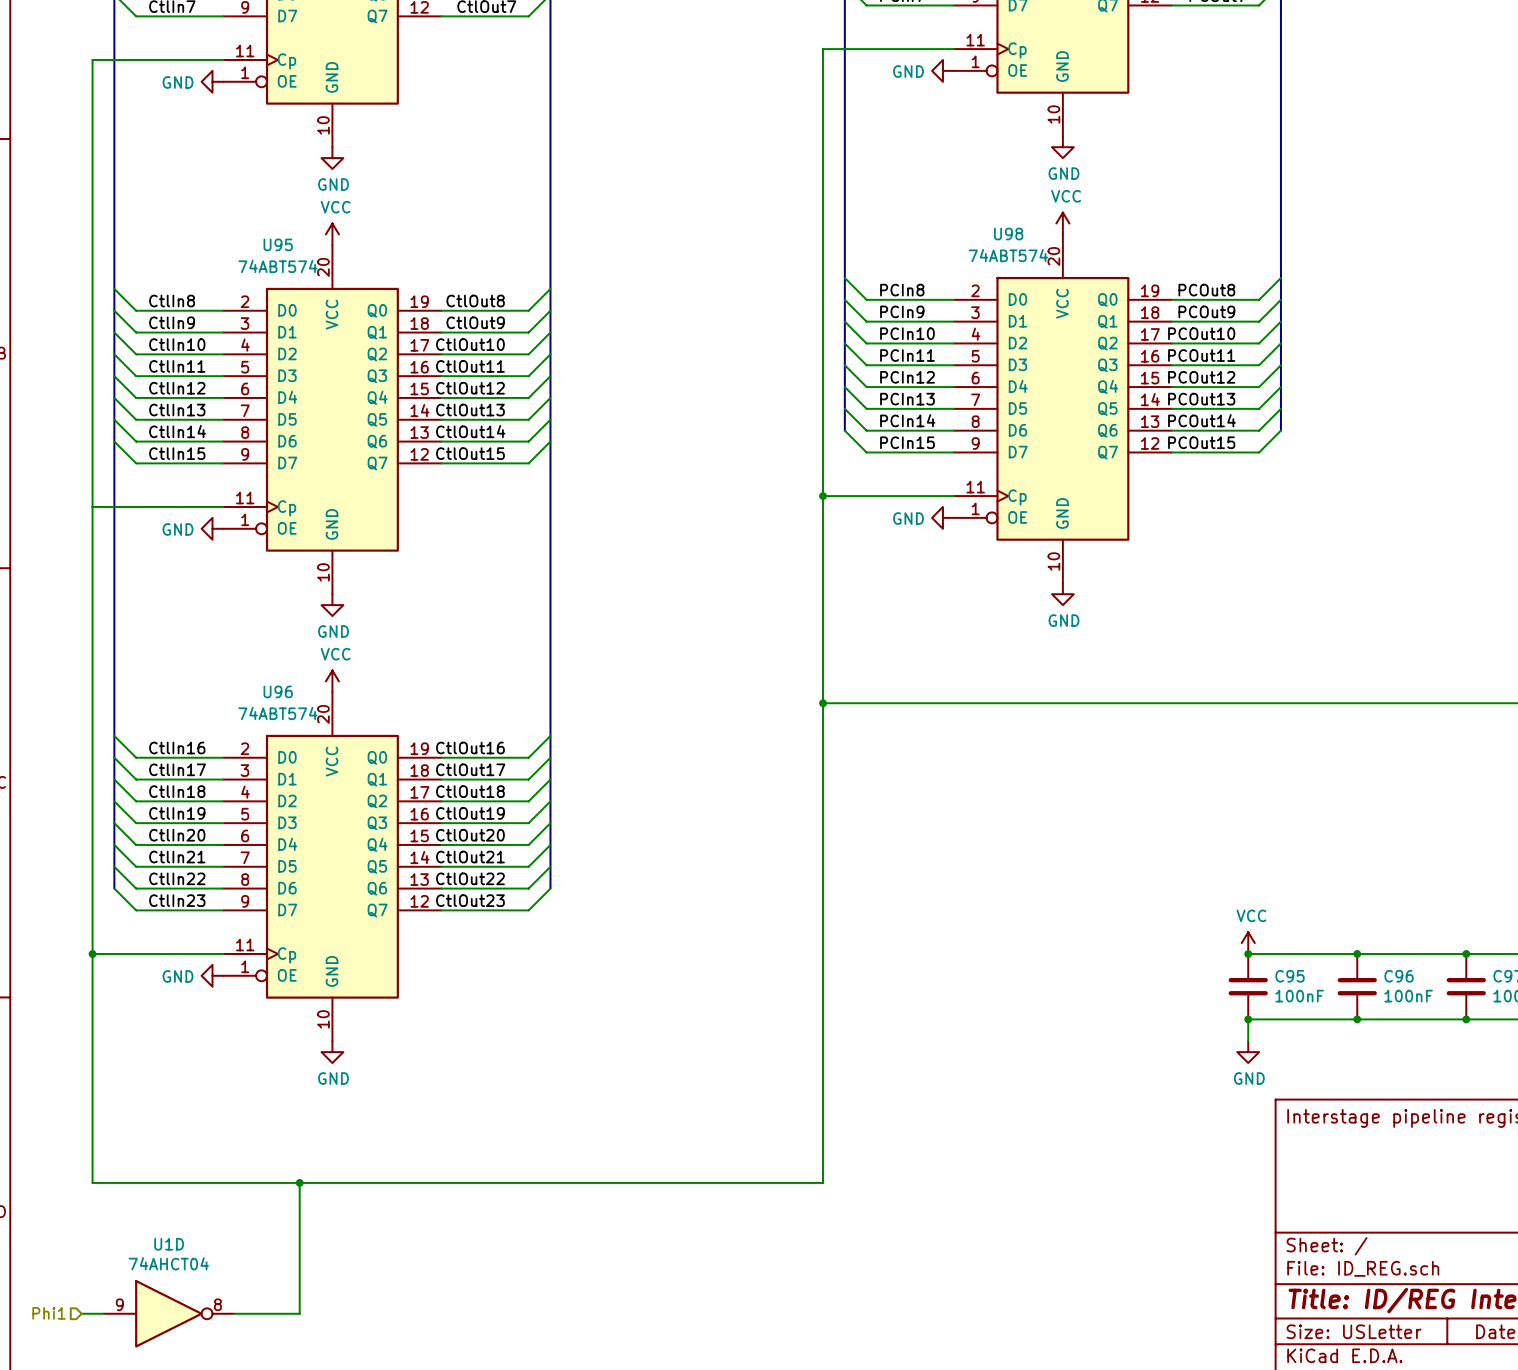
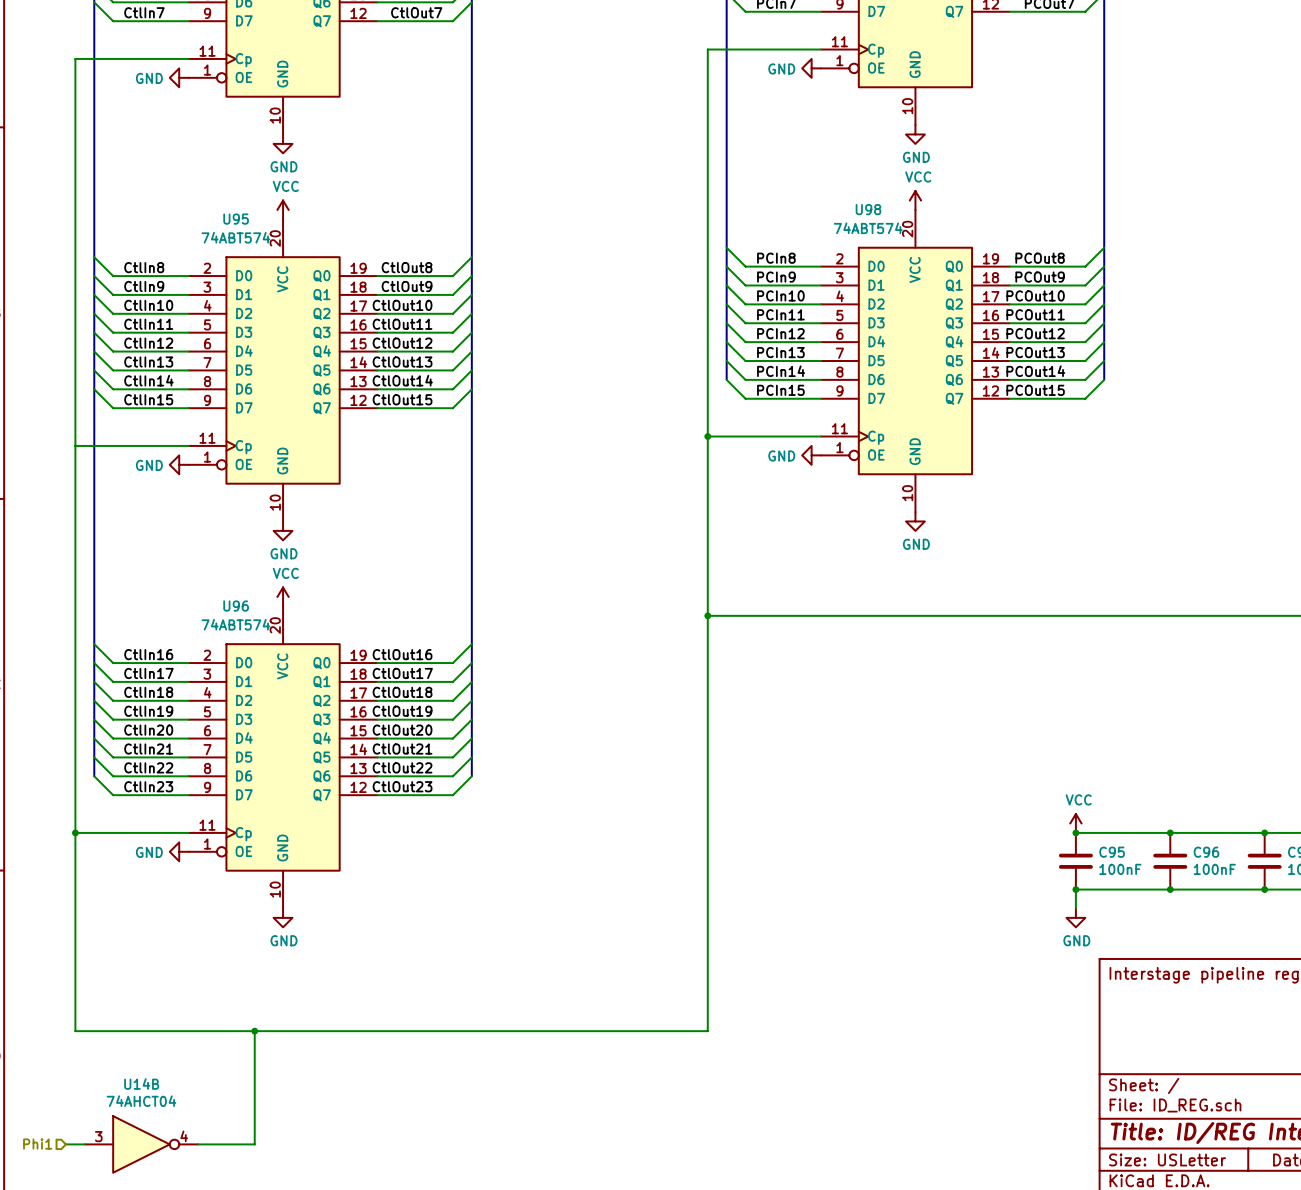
U1D name: U1D (169, 1244) -> U14B (141, 1083)
U1D pin number: 9 (119, 1304) -> 3 (98, 1136)
U1D pin number: 8 (217, 1304) -> 4 (184, 1136)

